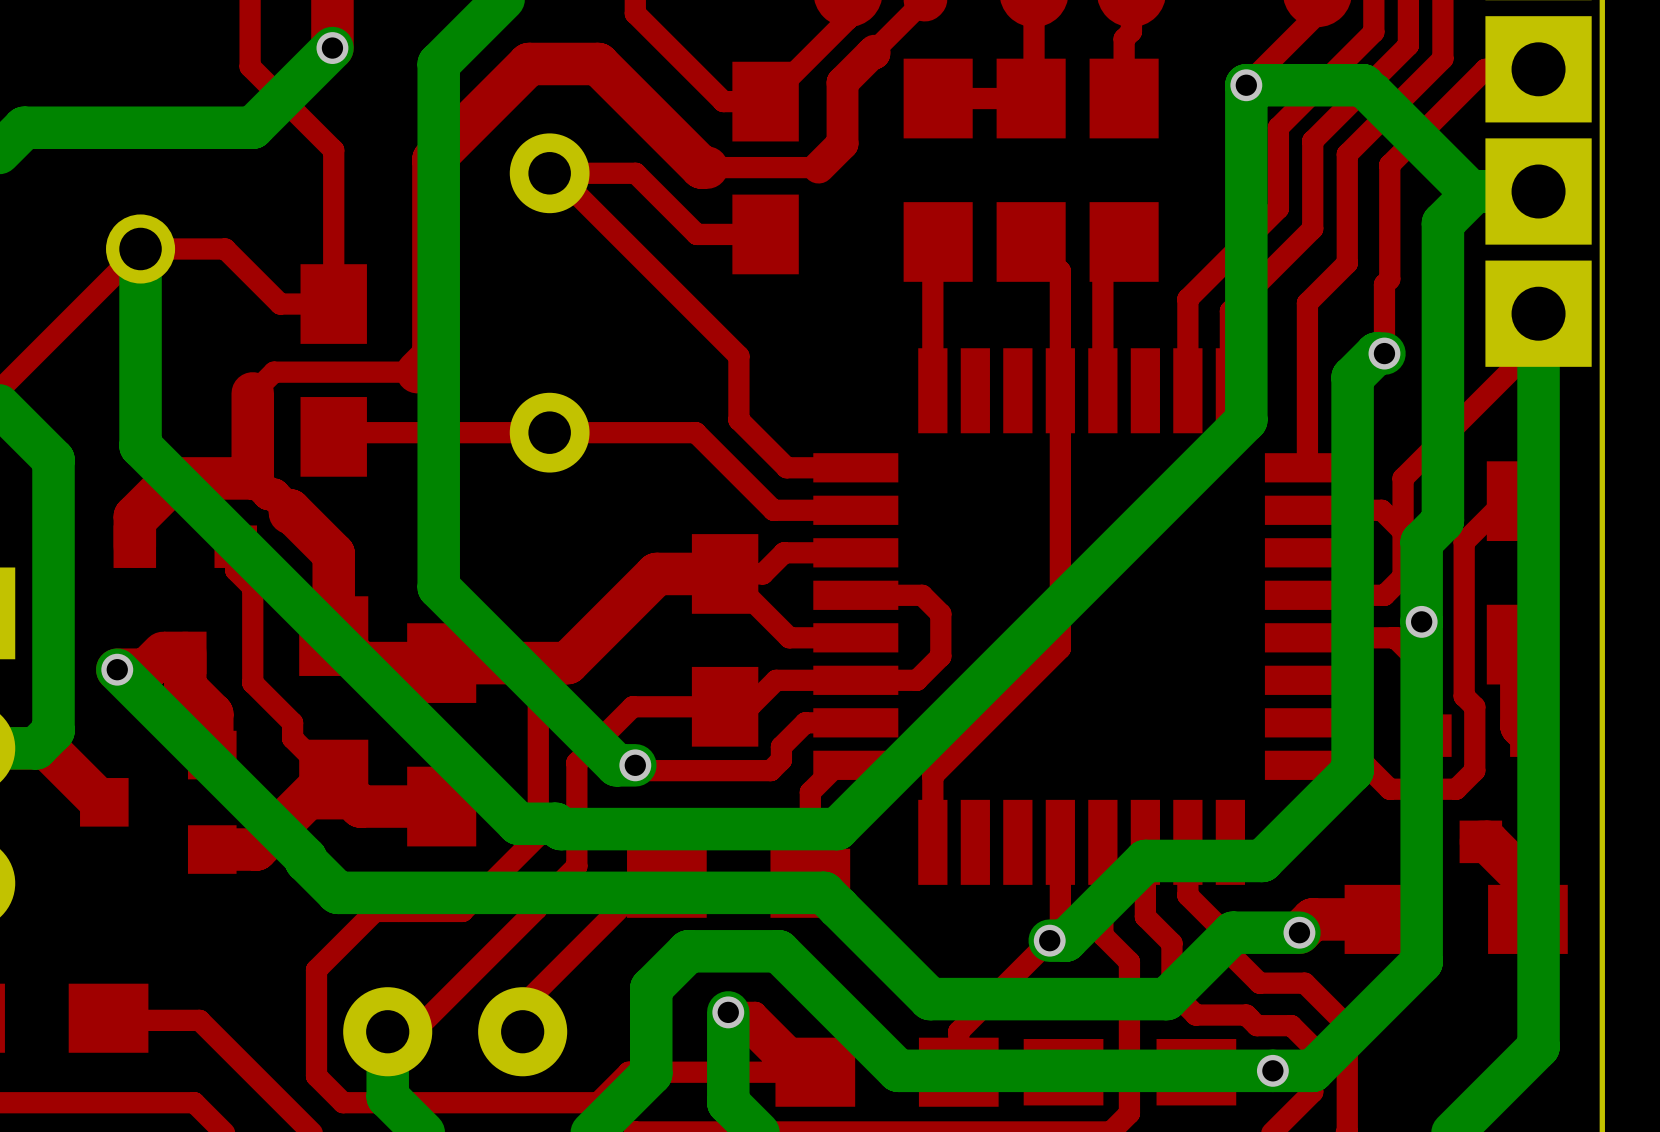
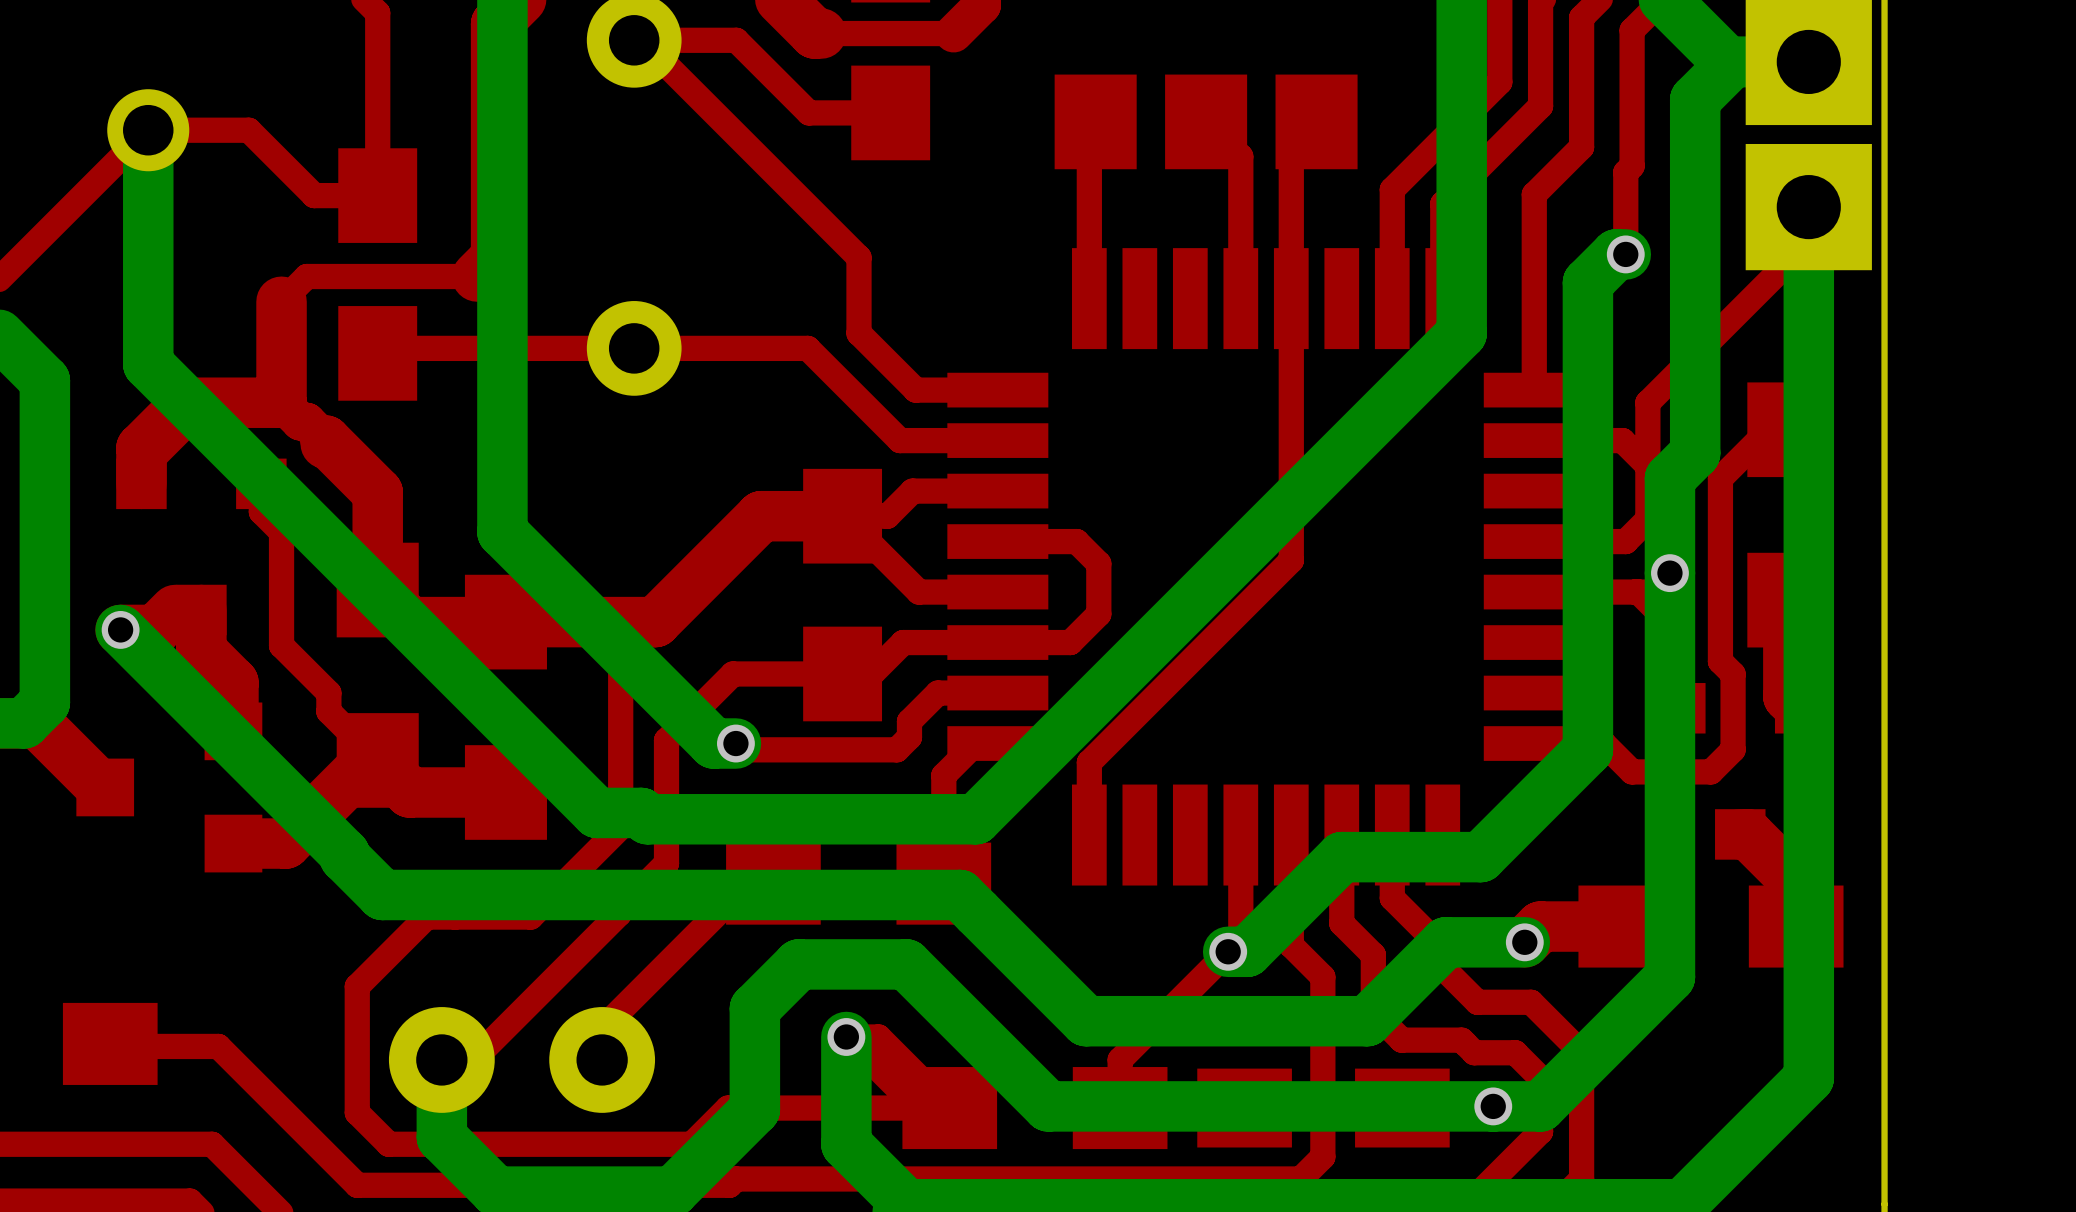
top track: (1060, 390) (1060, 648) (932, 775) (932, 781) -> (1291, 298) (1291, 560) (1089, 762)

